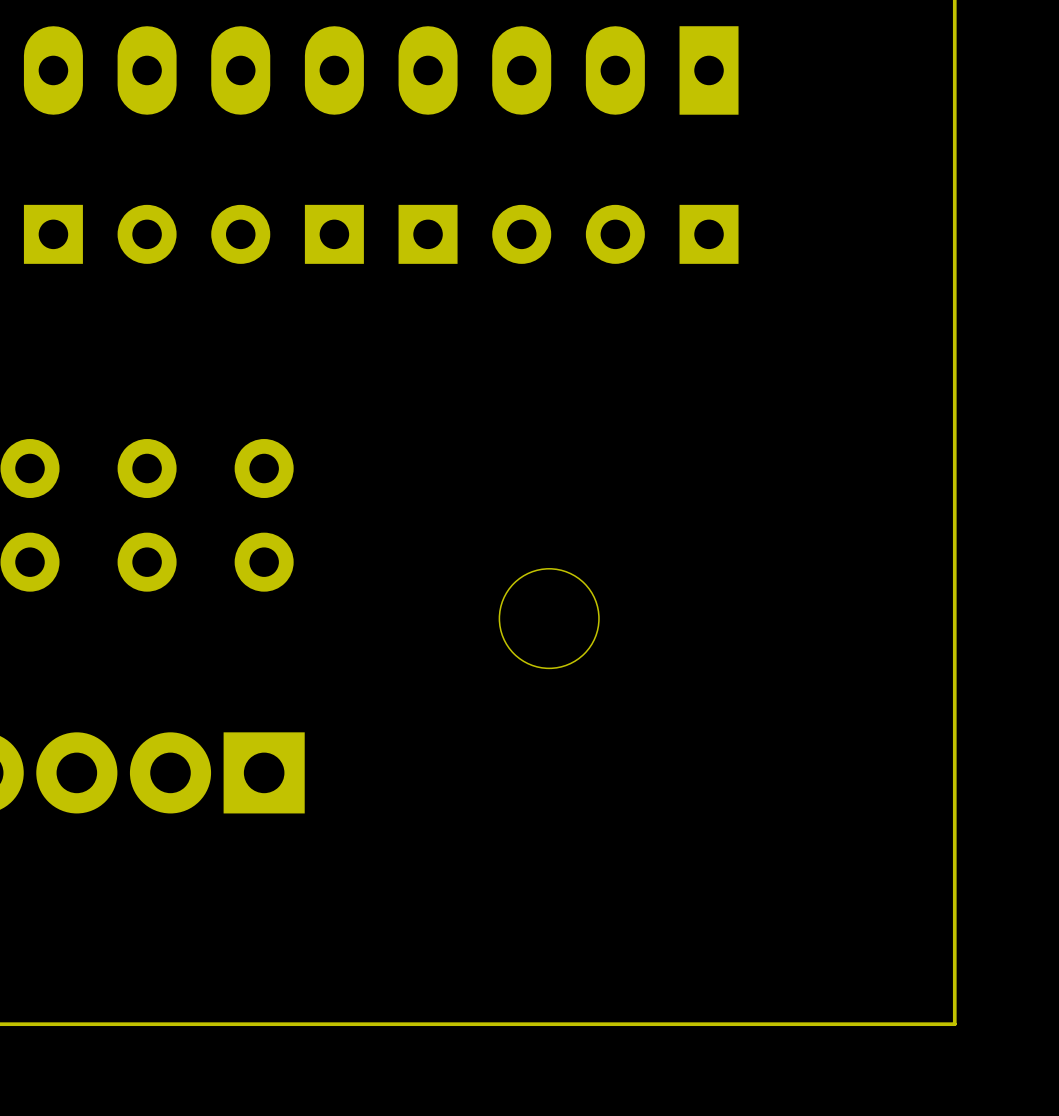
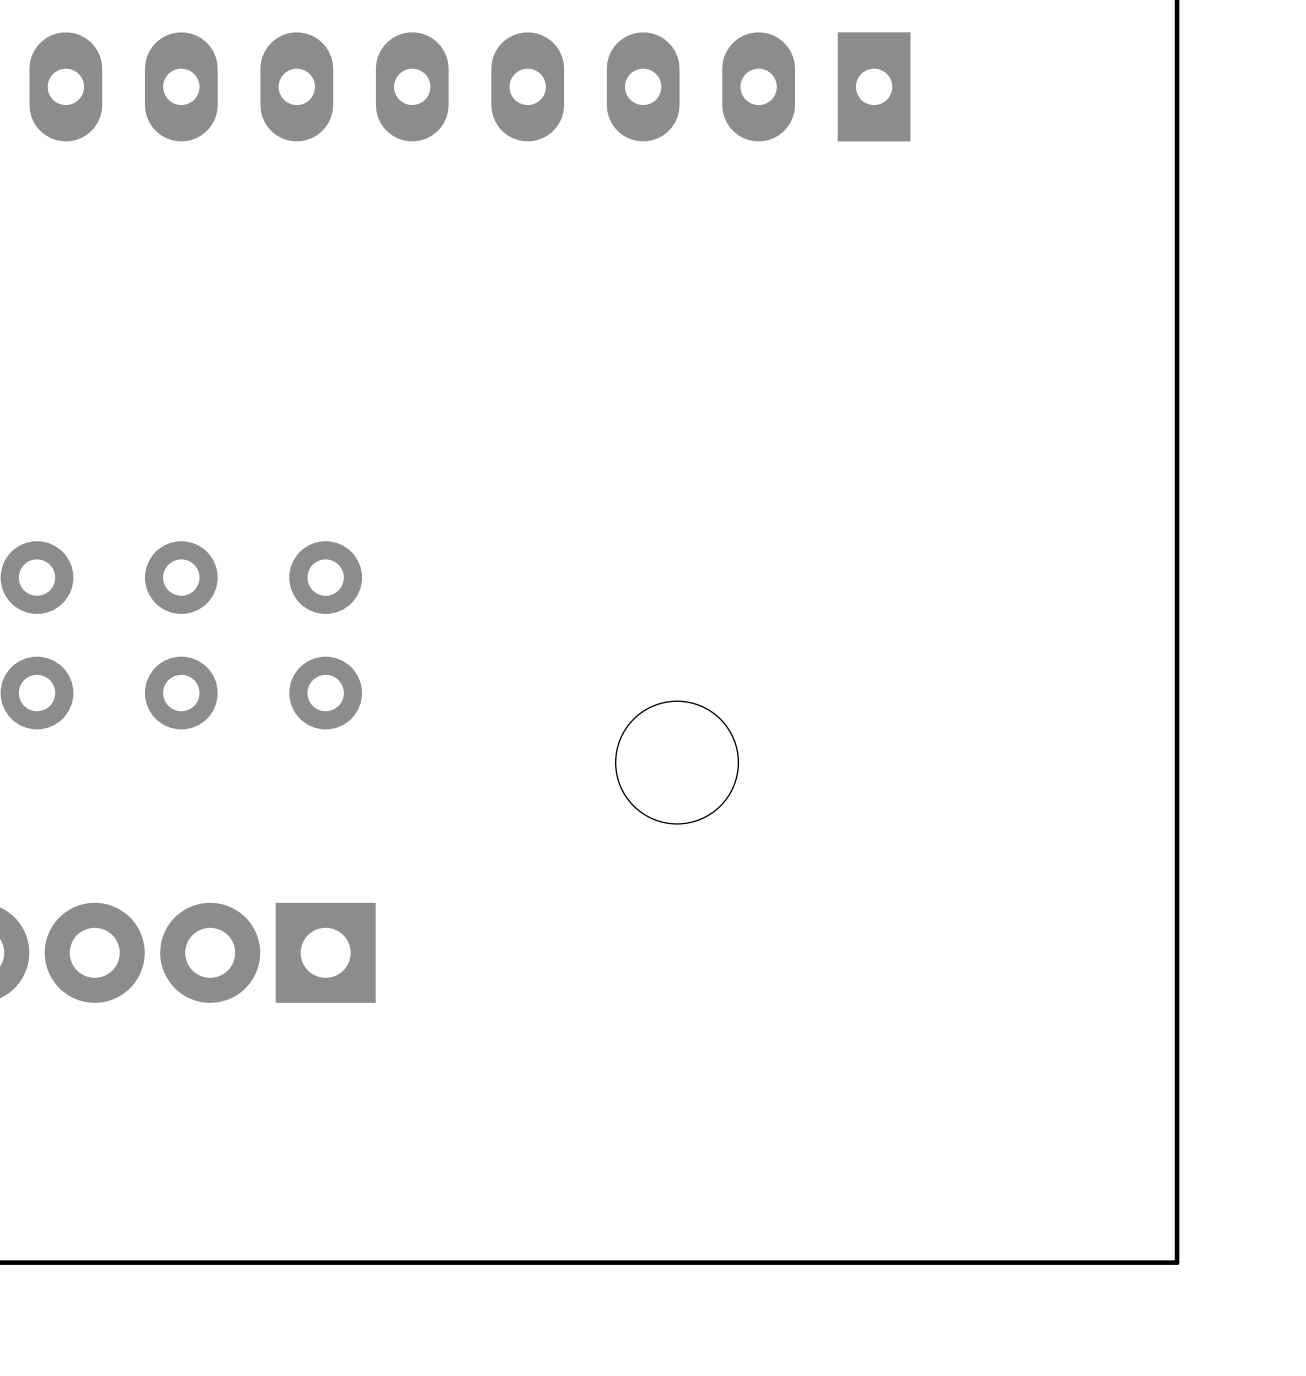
part: (100, 234) -> none
part: (287, 234) -> none
part: (474, 234) -> none
part: (662, 234) -> none

